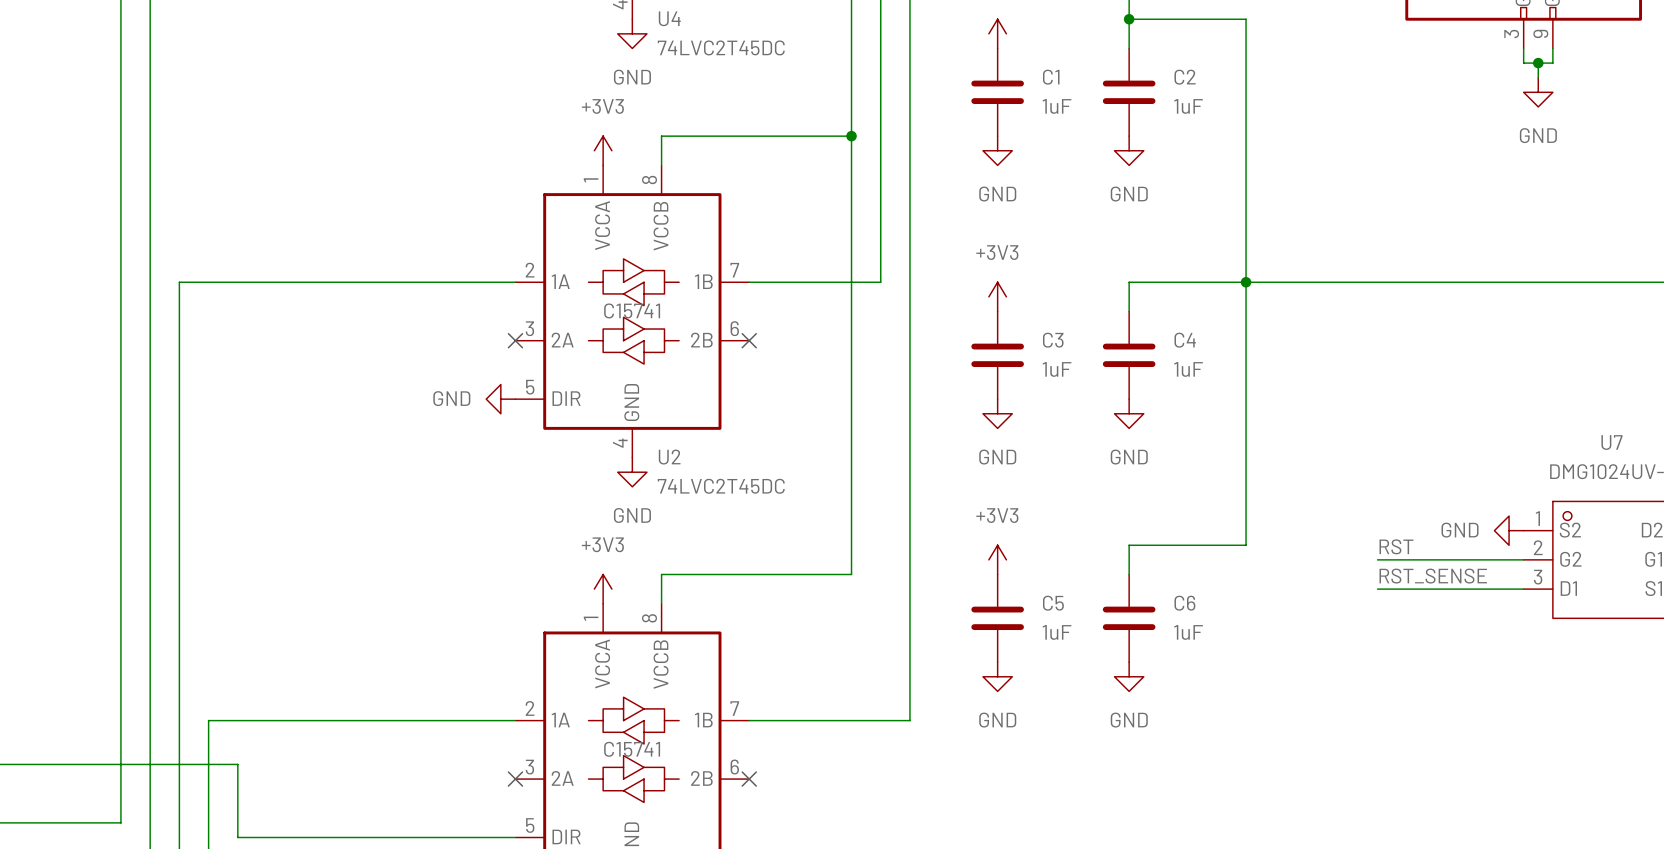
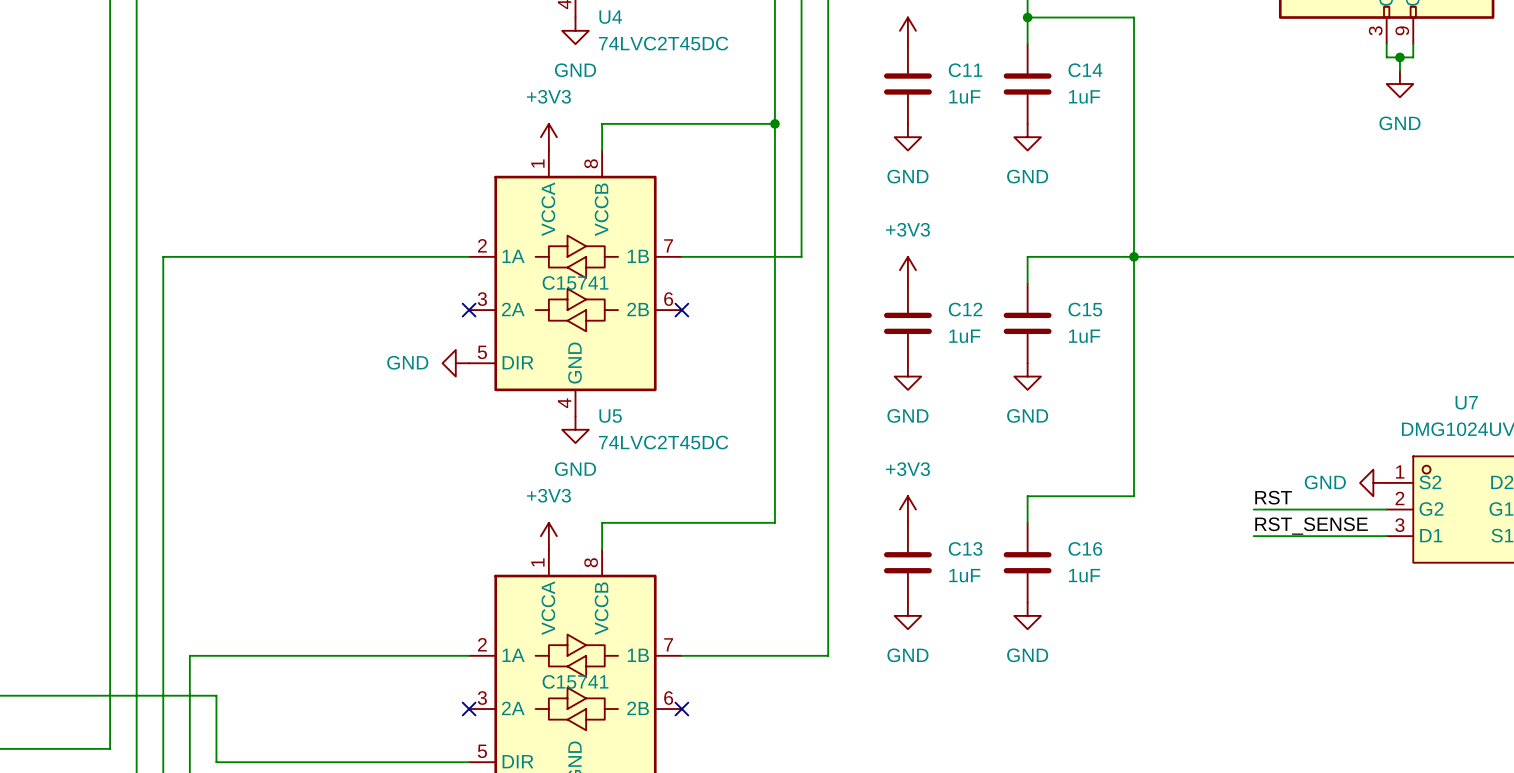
C1 name: C1 (1051, 77) -> C11 (965, 70)
C2 name: C2 (1185, 77) -> C14 (1085, 70)
C3 name: C3 (1053, 340) -> C12 (965, 309)
C4 name: C4 (1185, 340) -> C15 (1085, 309)
U2 name: U2 (669, 457) -> U5 (610, 416)
C5 name: C5 (1053, 603) -> C13 (965, 548)
C6 name: C6 (1184, 603) -> C16 (1085, 548)

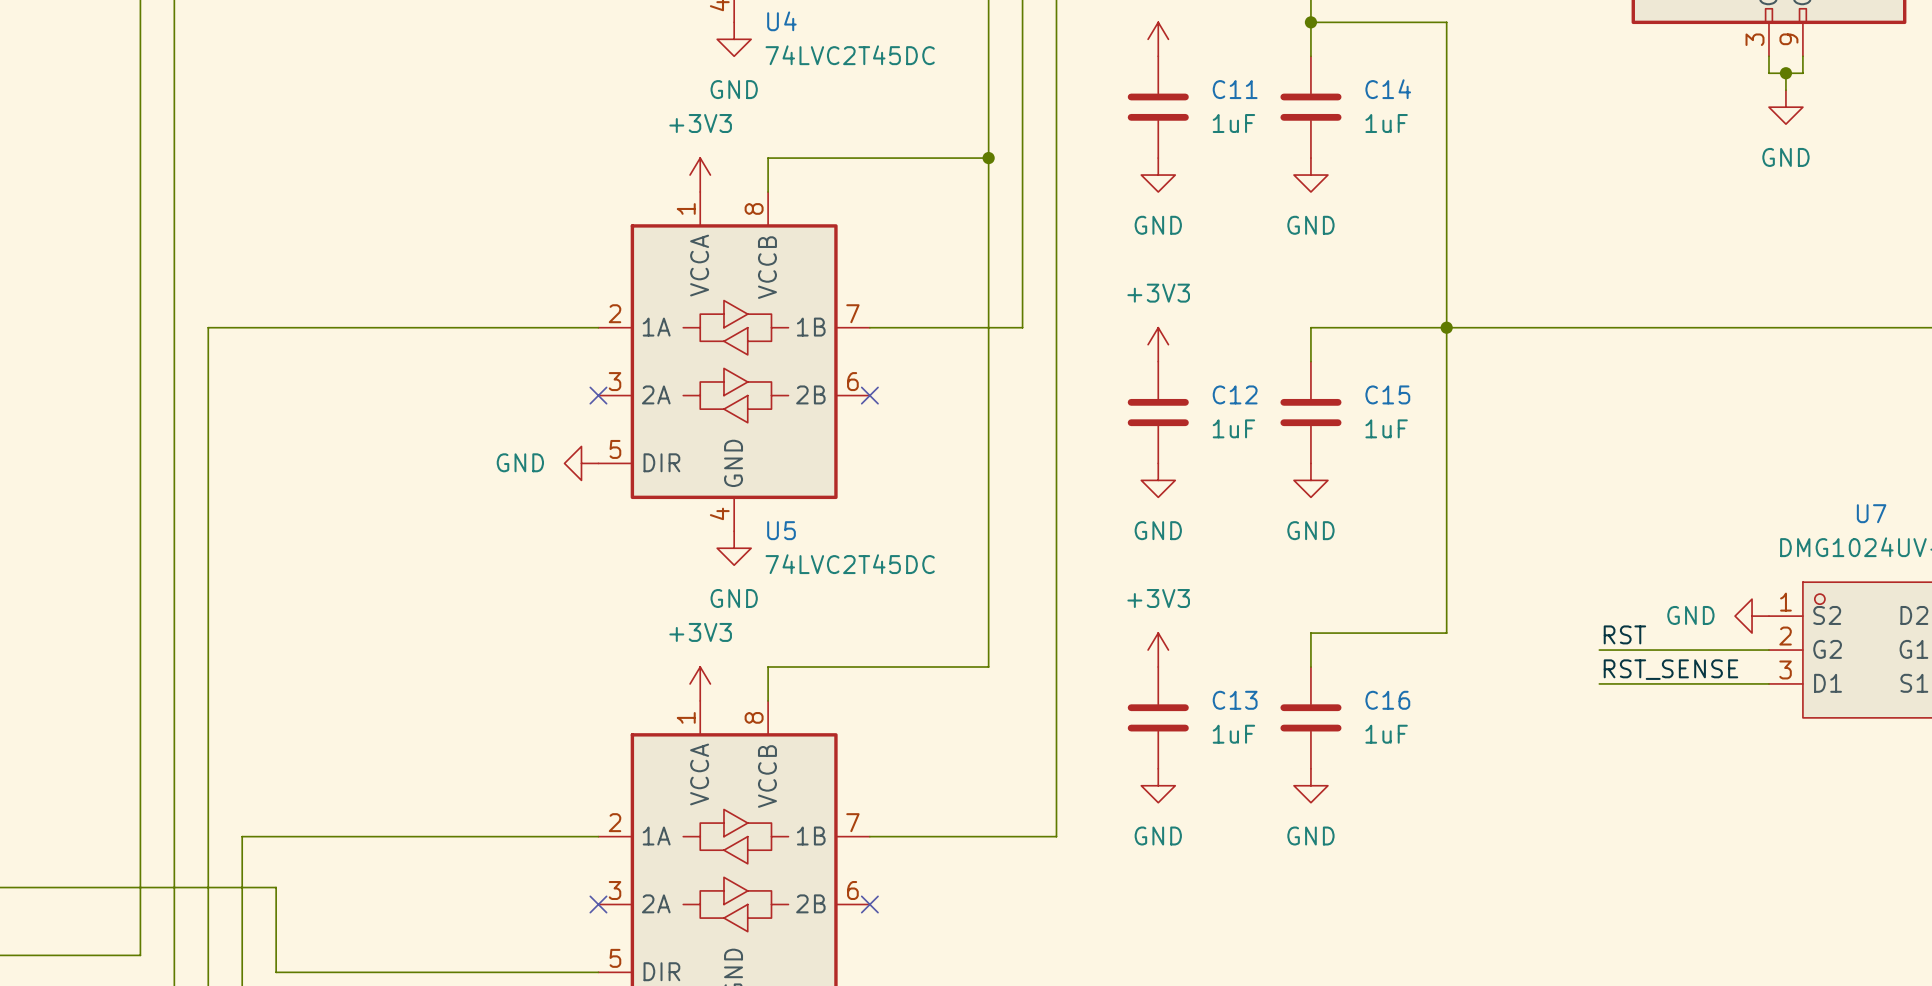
U5 text: C15741 (575, 282) -> none
part text: C15741 (575, 681) -> none

